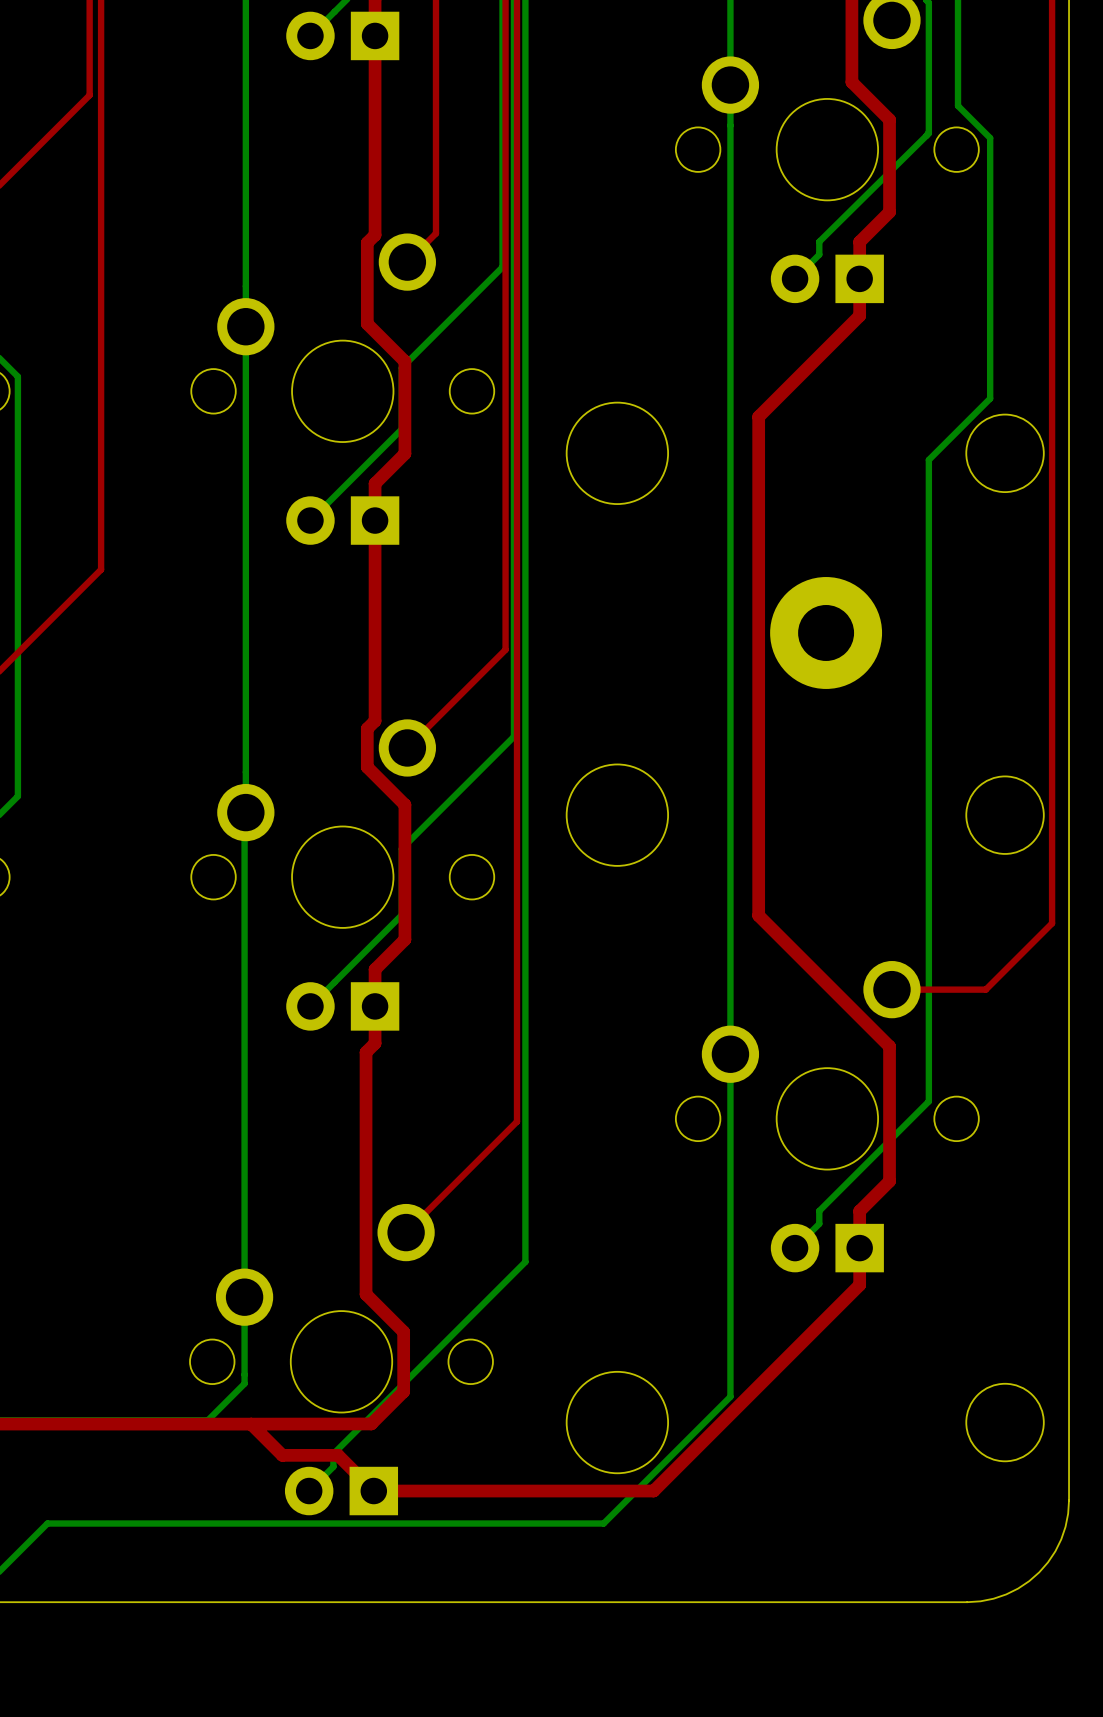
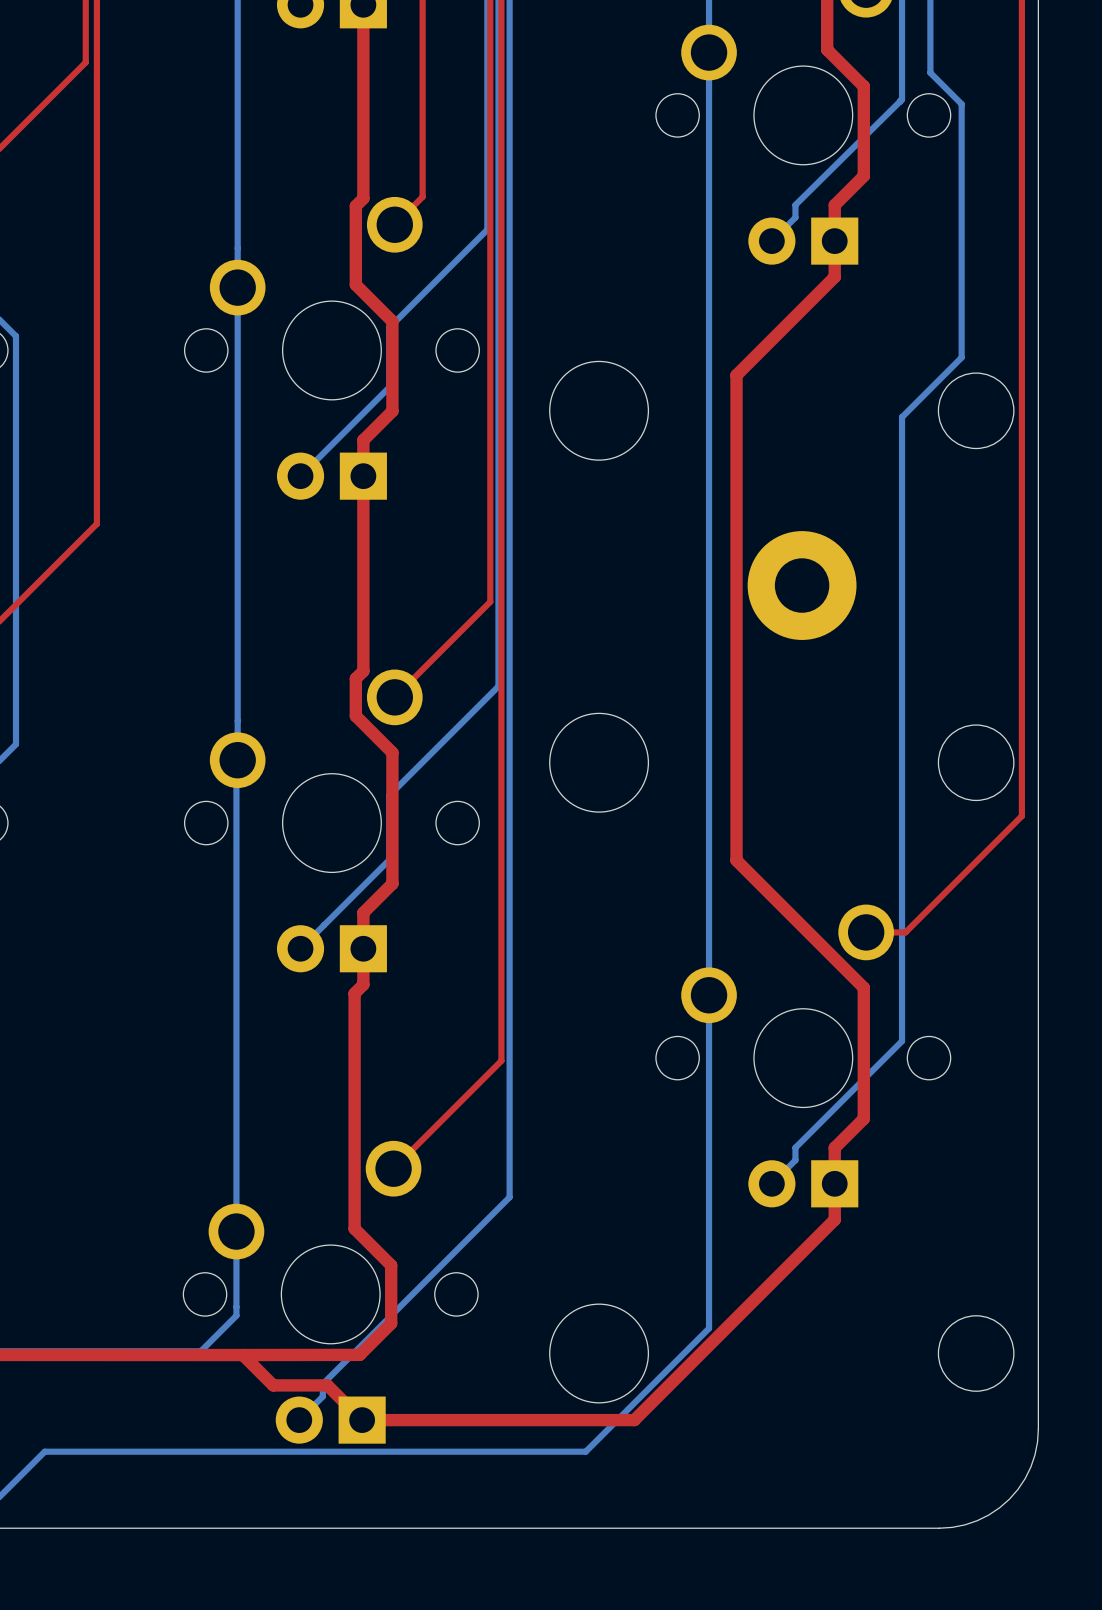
top track: (1052, 870) (1052, 923) (985, 989) (932, 989) -> (1021, 816) (905, 932)

